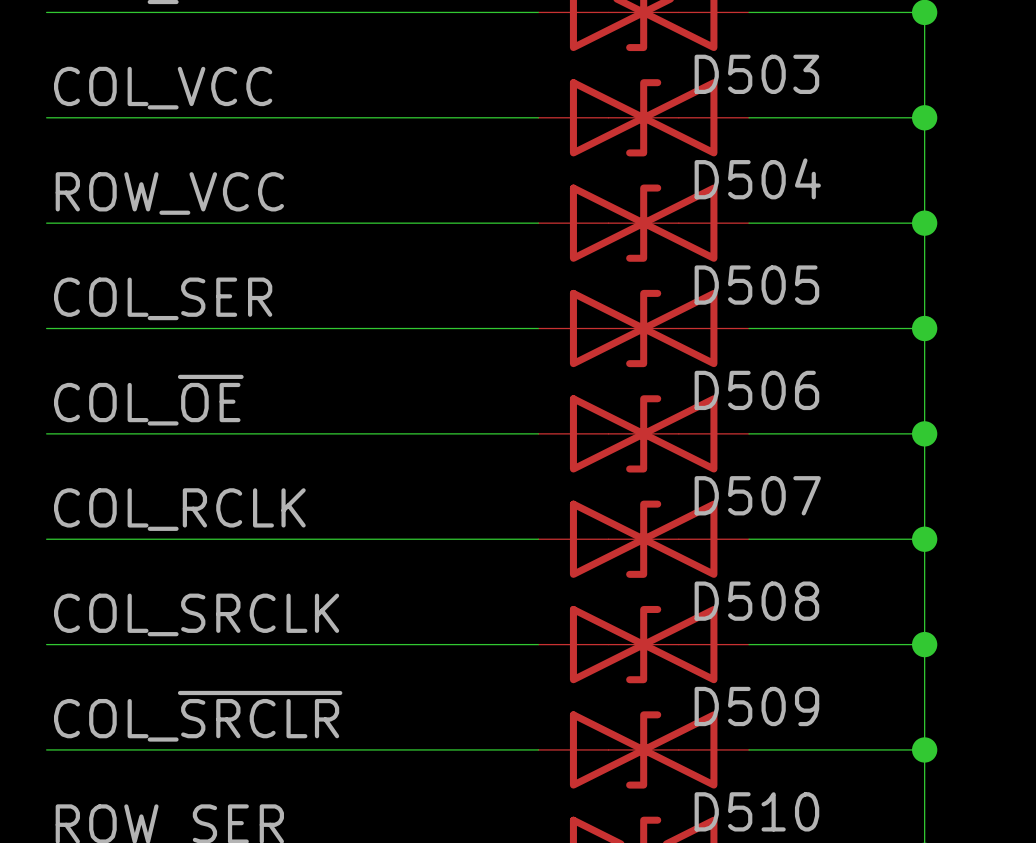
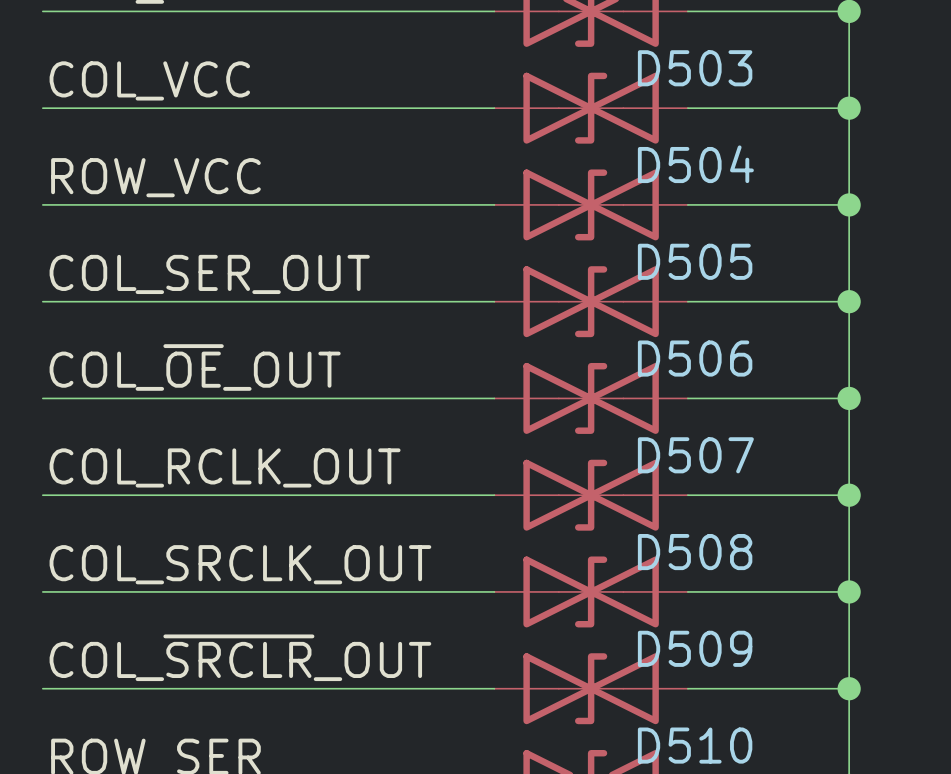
label: COL_SER (163, 298) -> COL_SER_OUT (209, 274)
label: COL_~{OE} (148, 400) -> COL_~{OE}_OUT (195, 367)
label: COL_RCLK (179, 509) -> COL_RCLK_OUT (225, 467)
label: COL_SRCLK (196, 614) -> COL_SRCLK_OUT (240, 564)
label: COL_~{SRCLR} (198, 716) -> COL_~{SRCLR}_OUT (240, 657)

